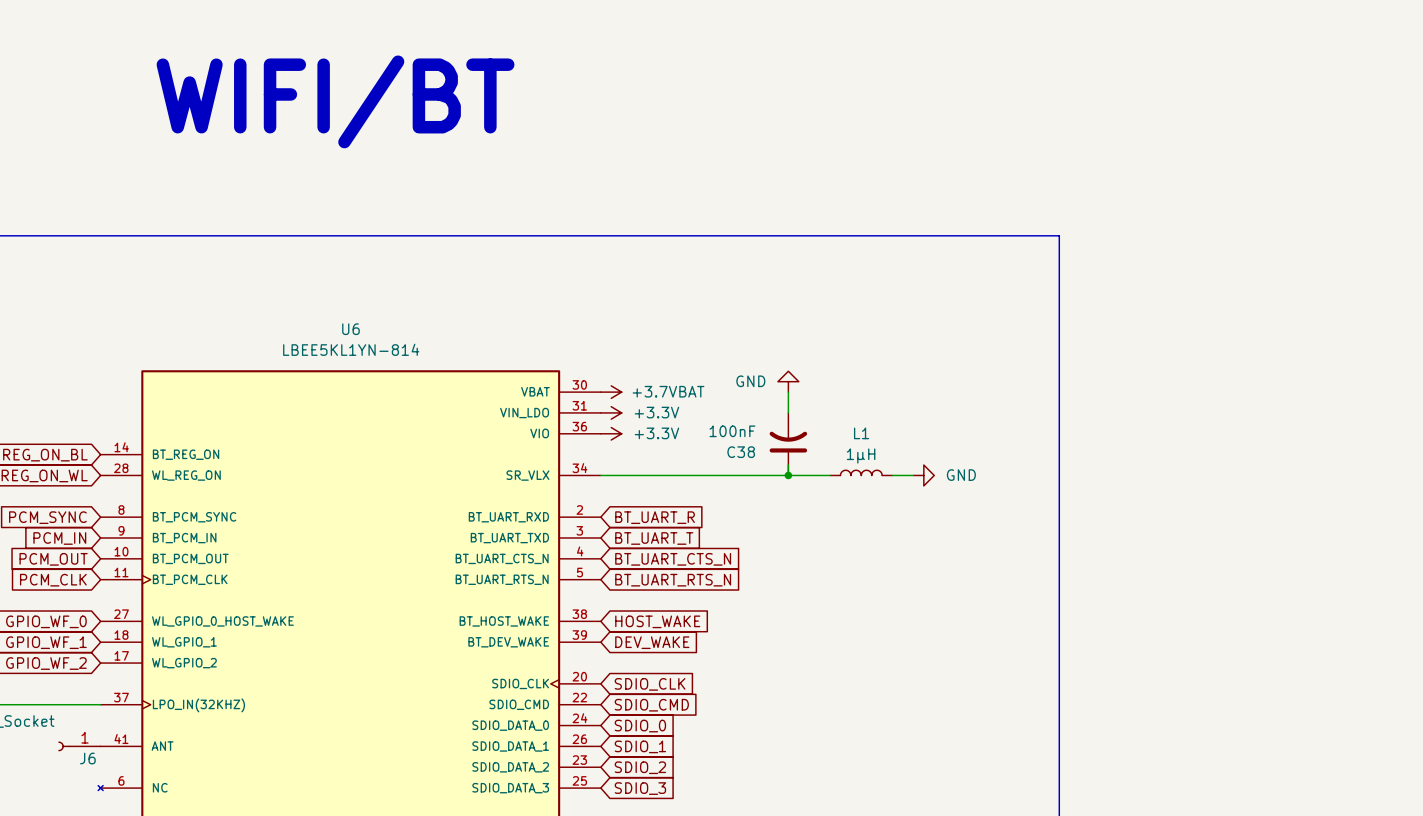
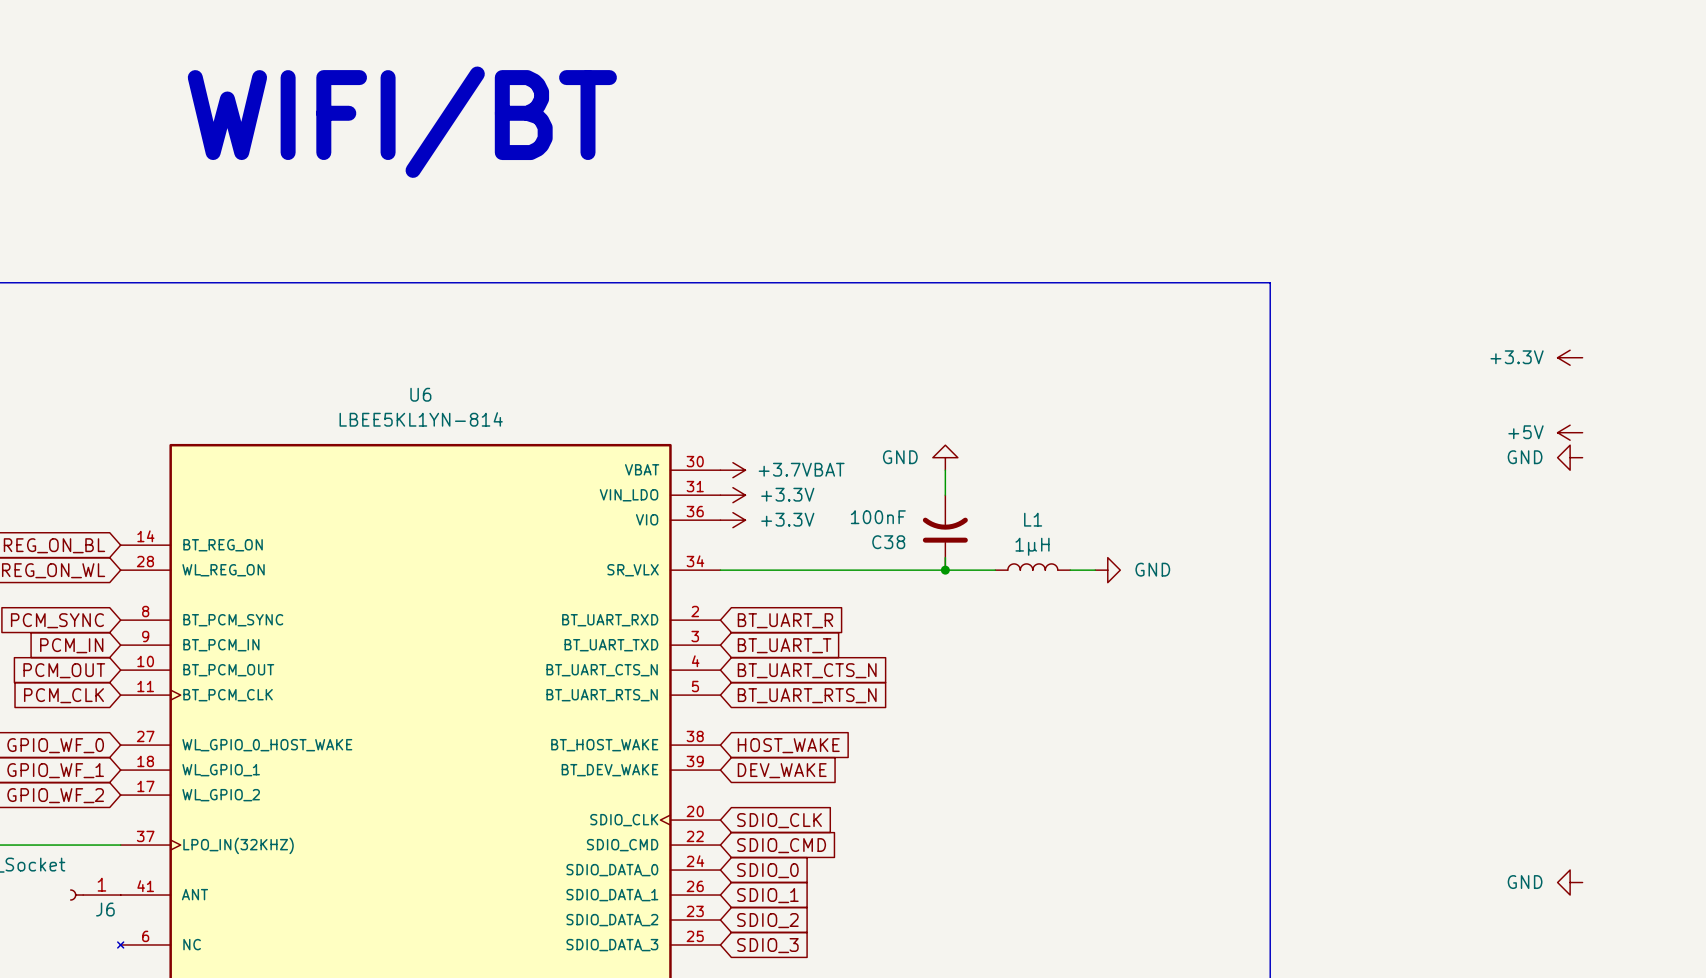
power symbol: none -> +3.3V (1570, 357)
power symbol: none -> +5V (1570, 432)
power symbol: none -> GND (1570, 457)
power symbol: none -> GND (1570, 882)

